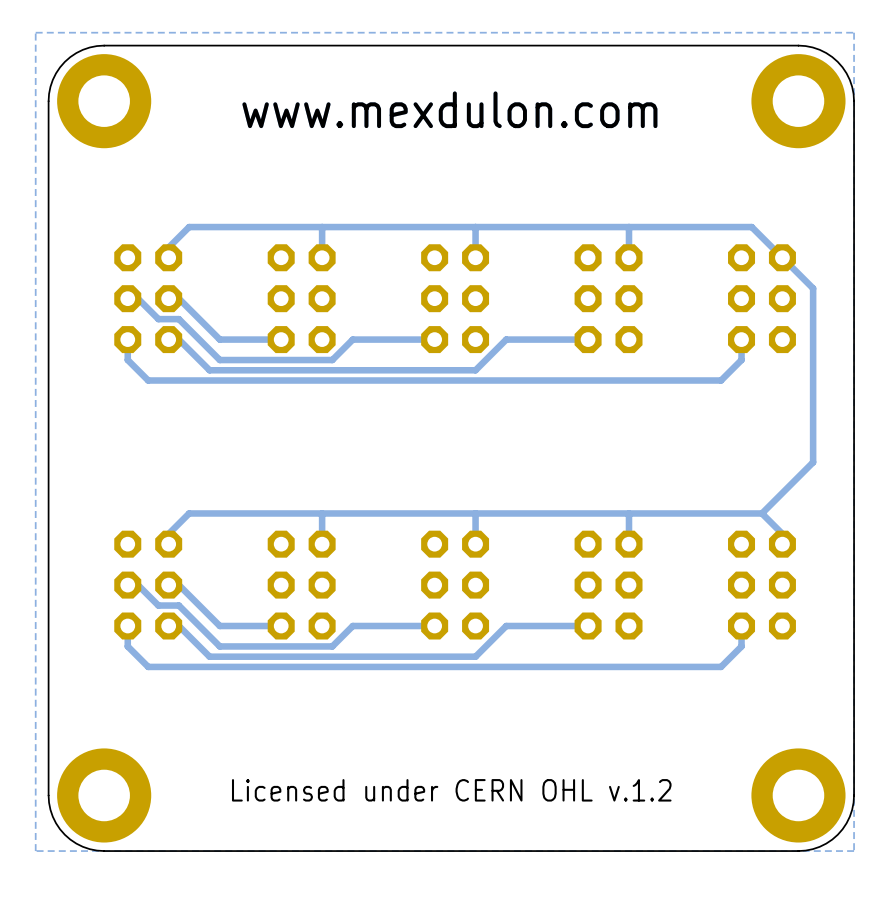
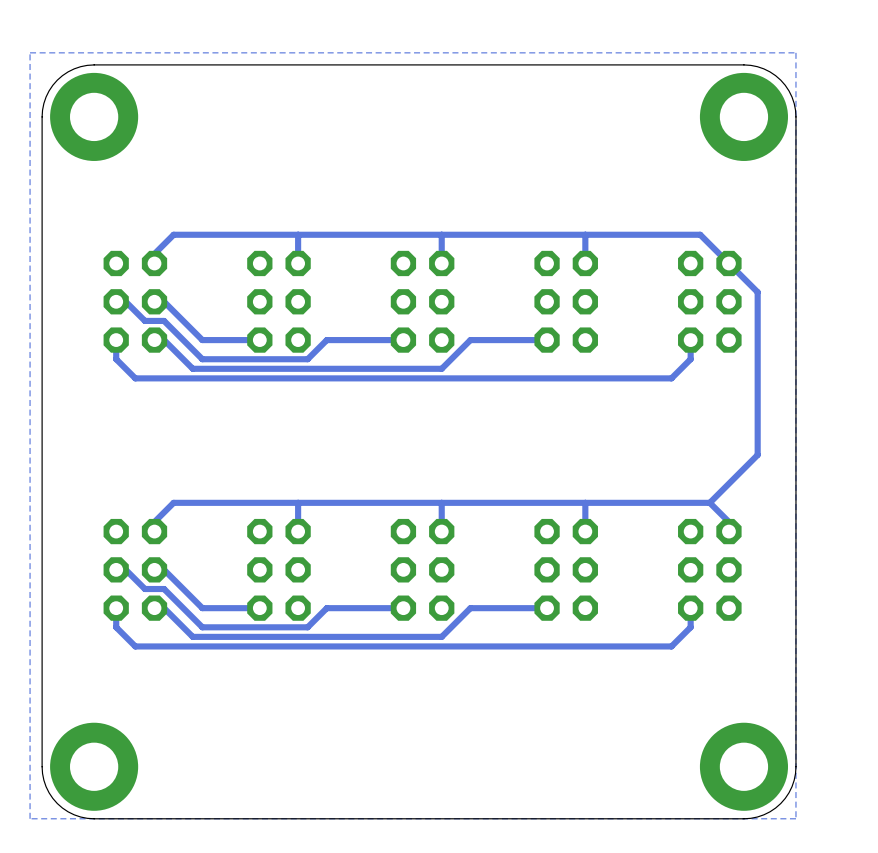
text: www.mexdulon.com (449, 109) -> none
text: Licensed under CERN OHL v.1.2 (451, 790) -> none

